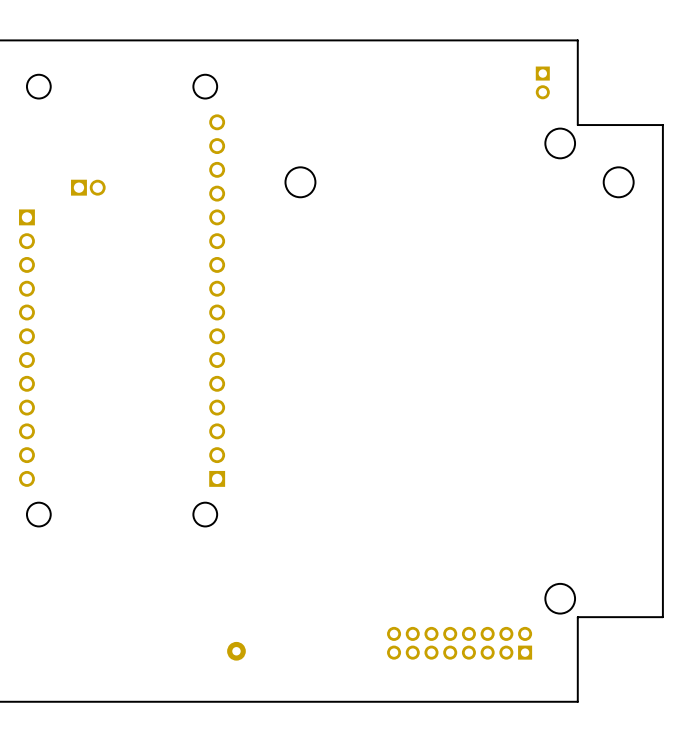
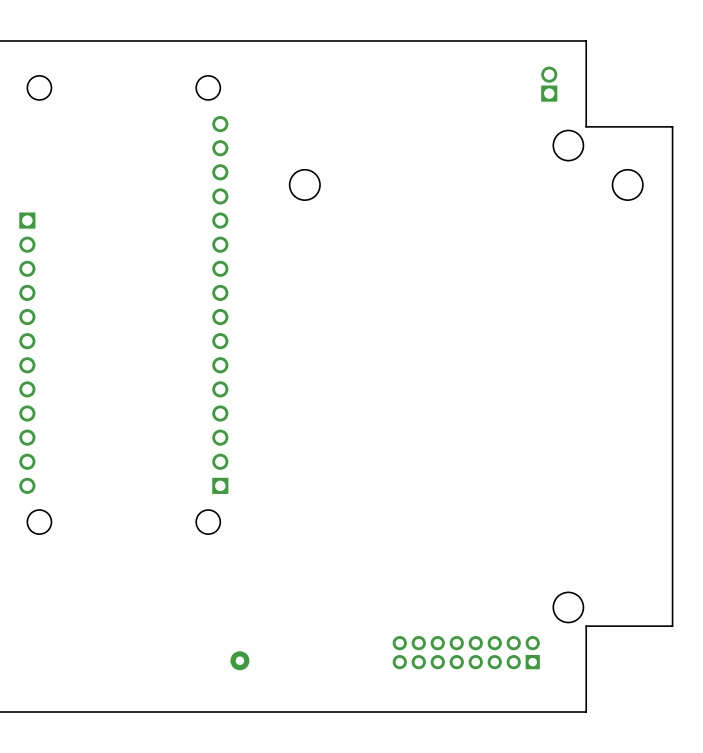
part footprint: [535, 66, 550, 100] -> [541, 66, 558, 102]
part: (88, 187) -> none

